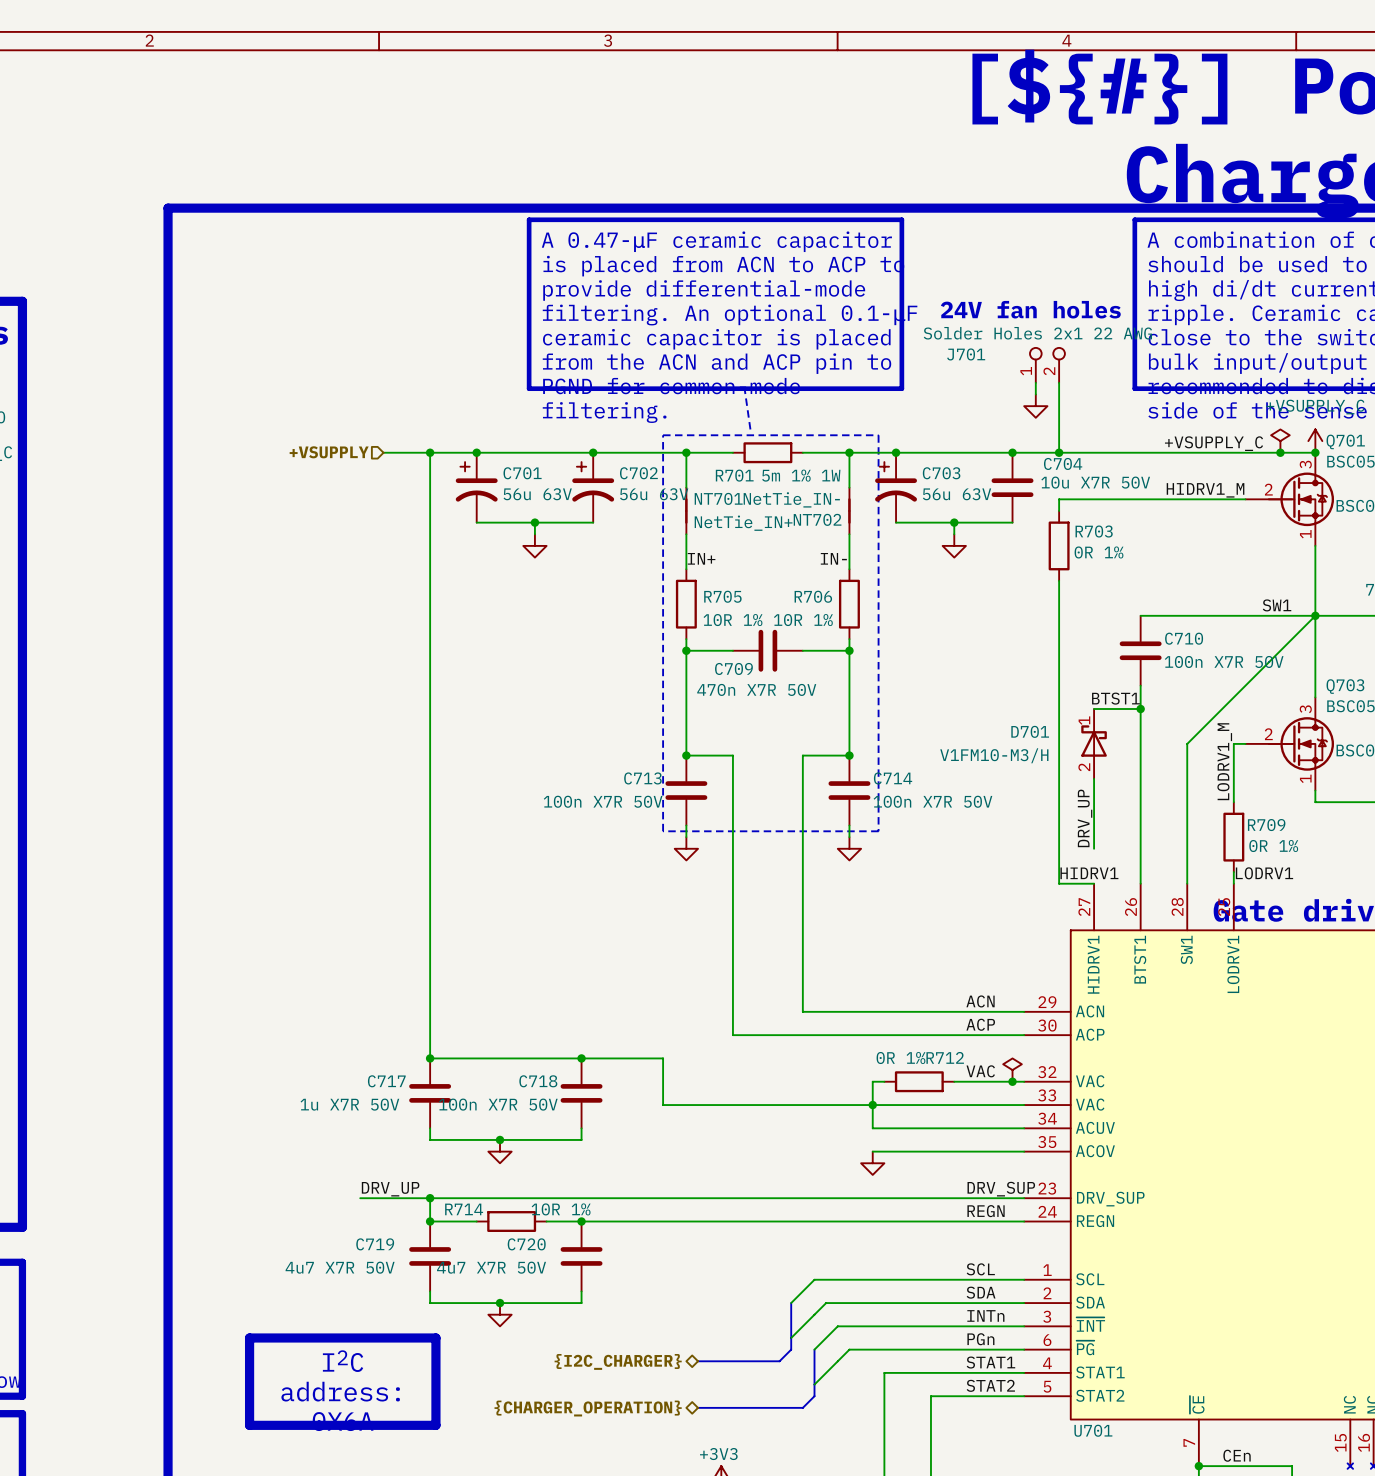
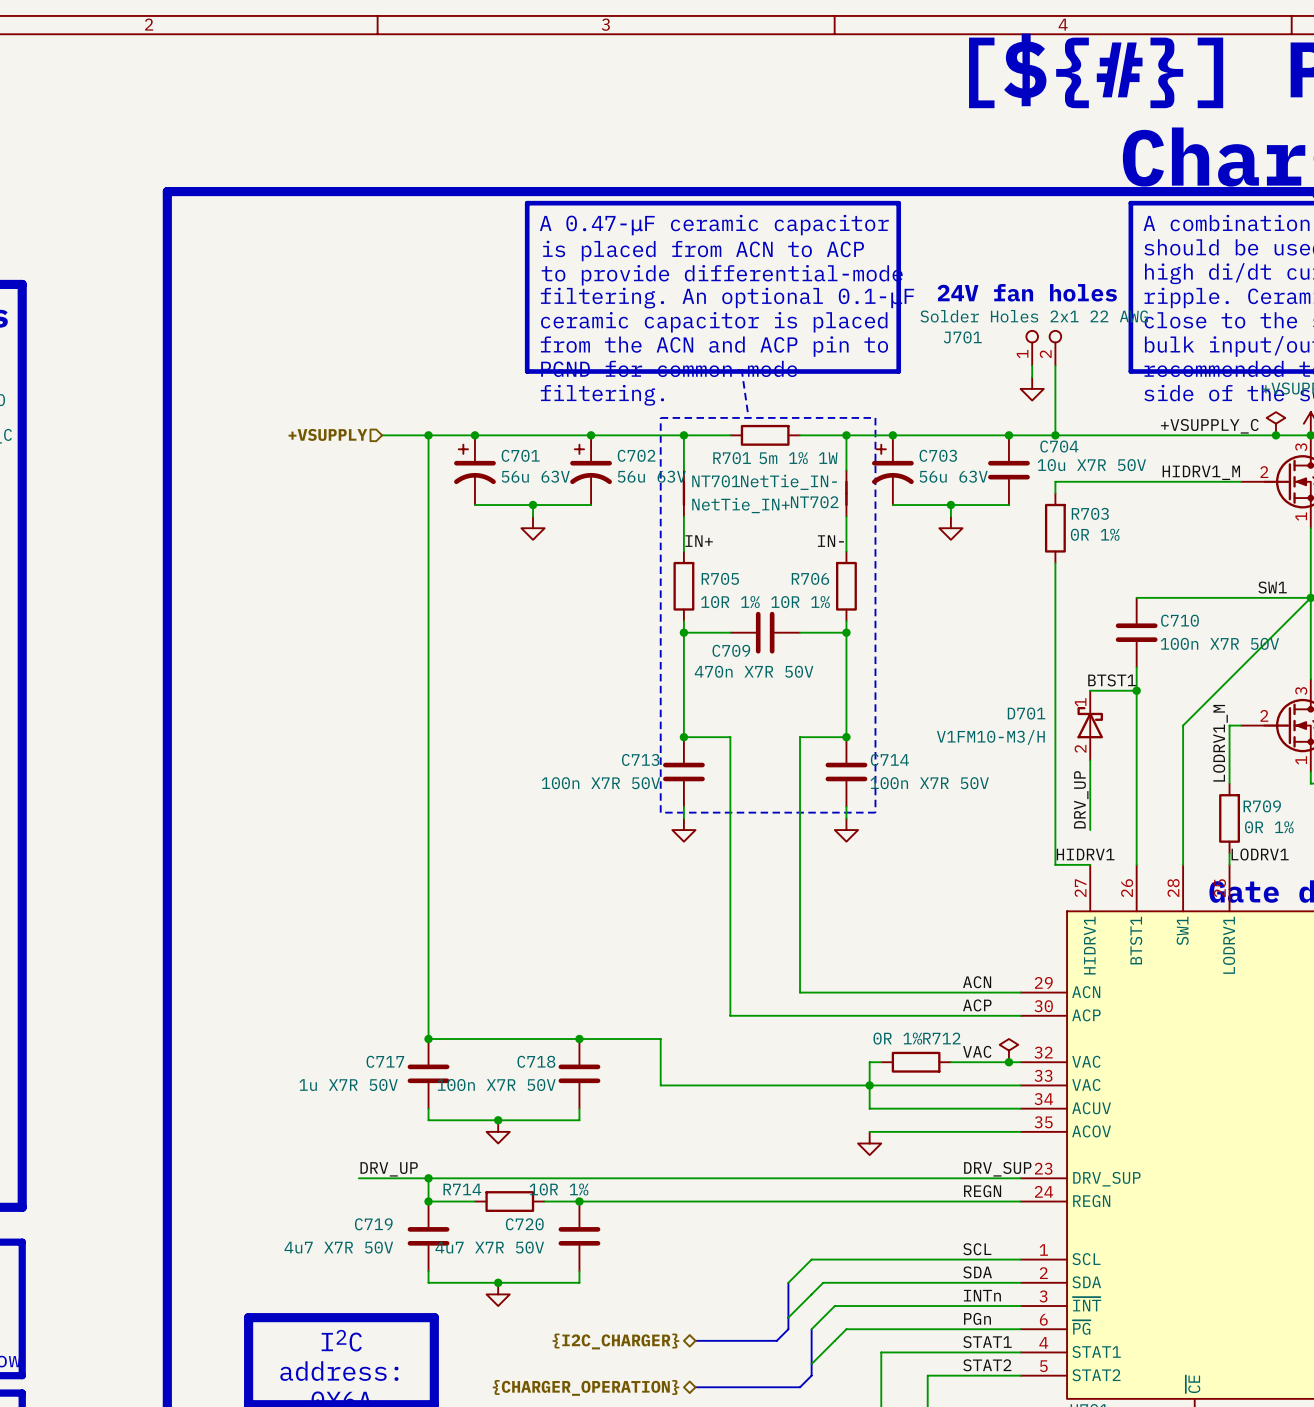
text: is placed from ACN to ACP to (723, 266) -> is placed from ACN to ACP (703, 251)
text: provide differential-mode (704, 290) -> to provide differential-mode (722, 275)

